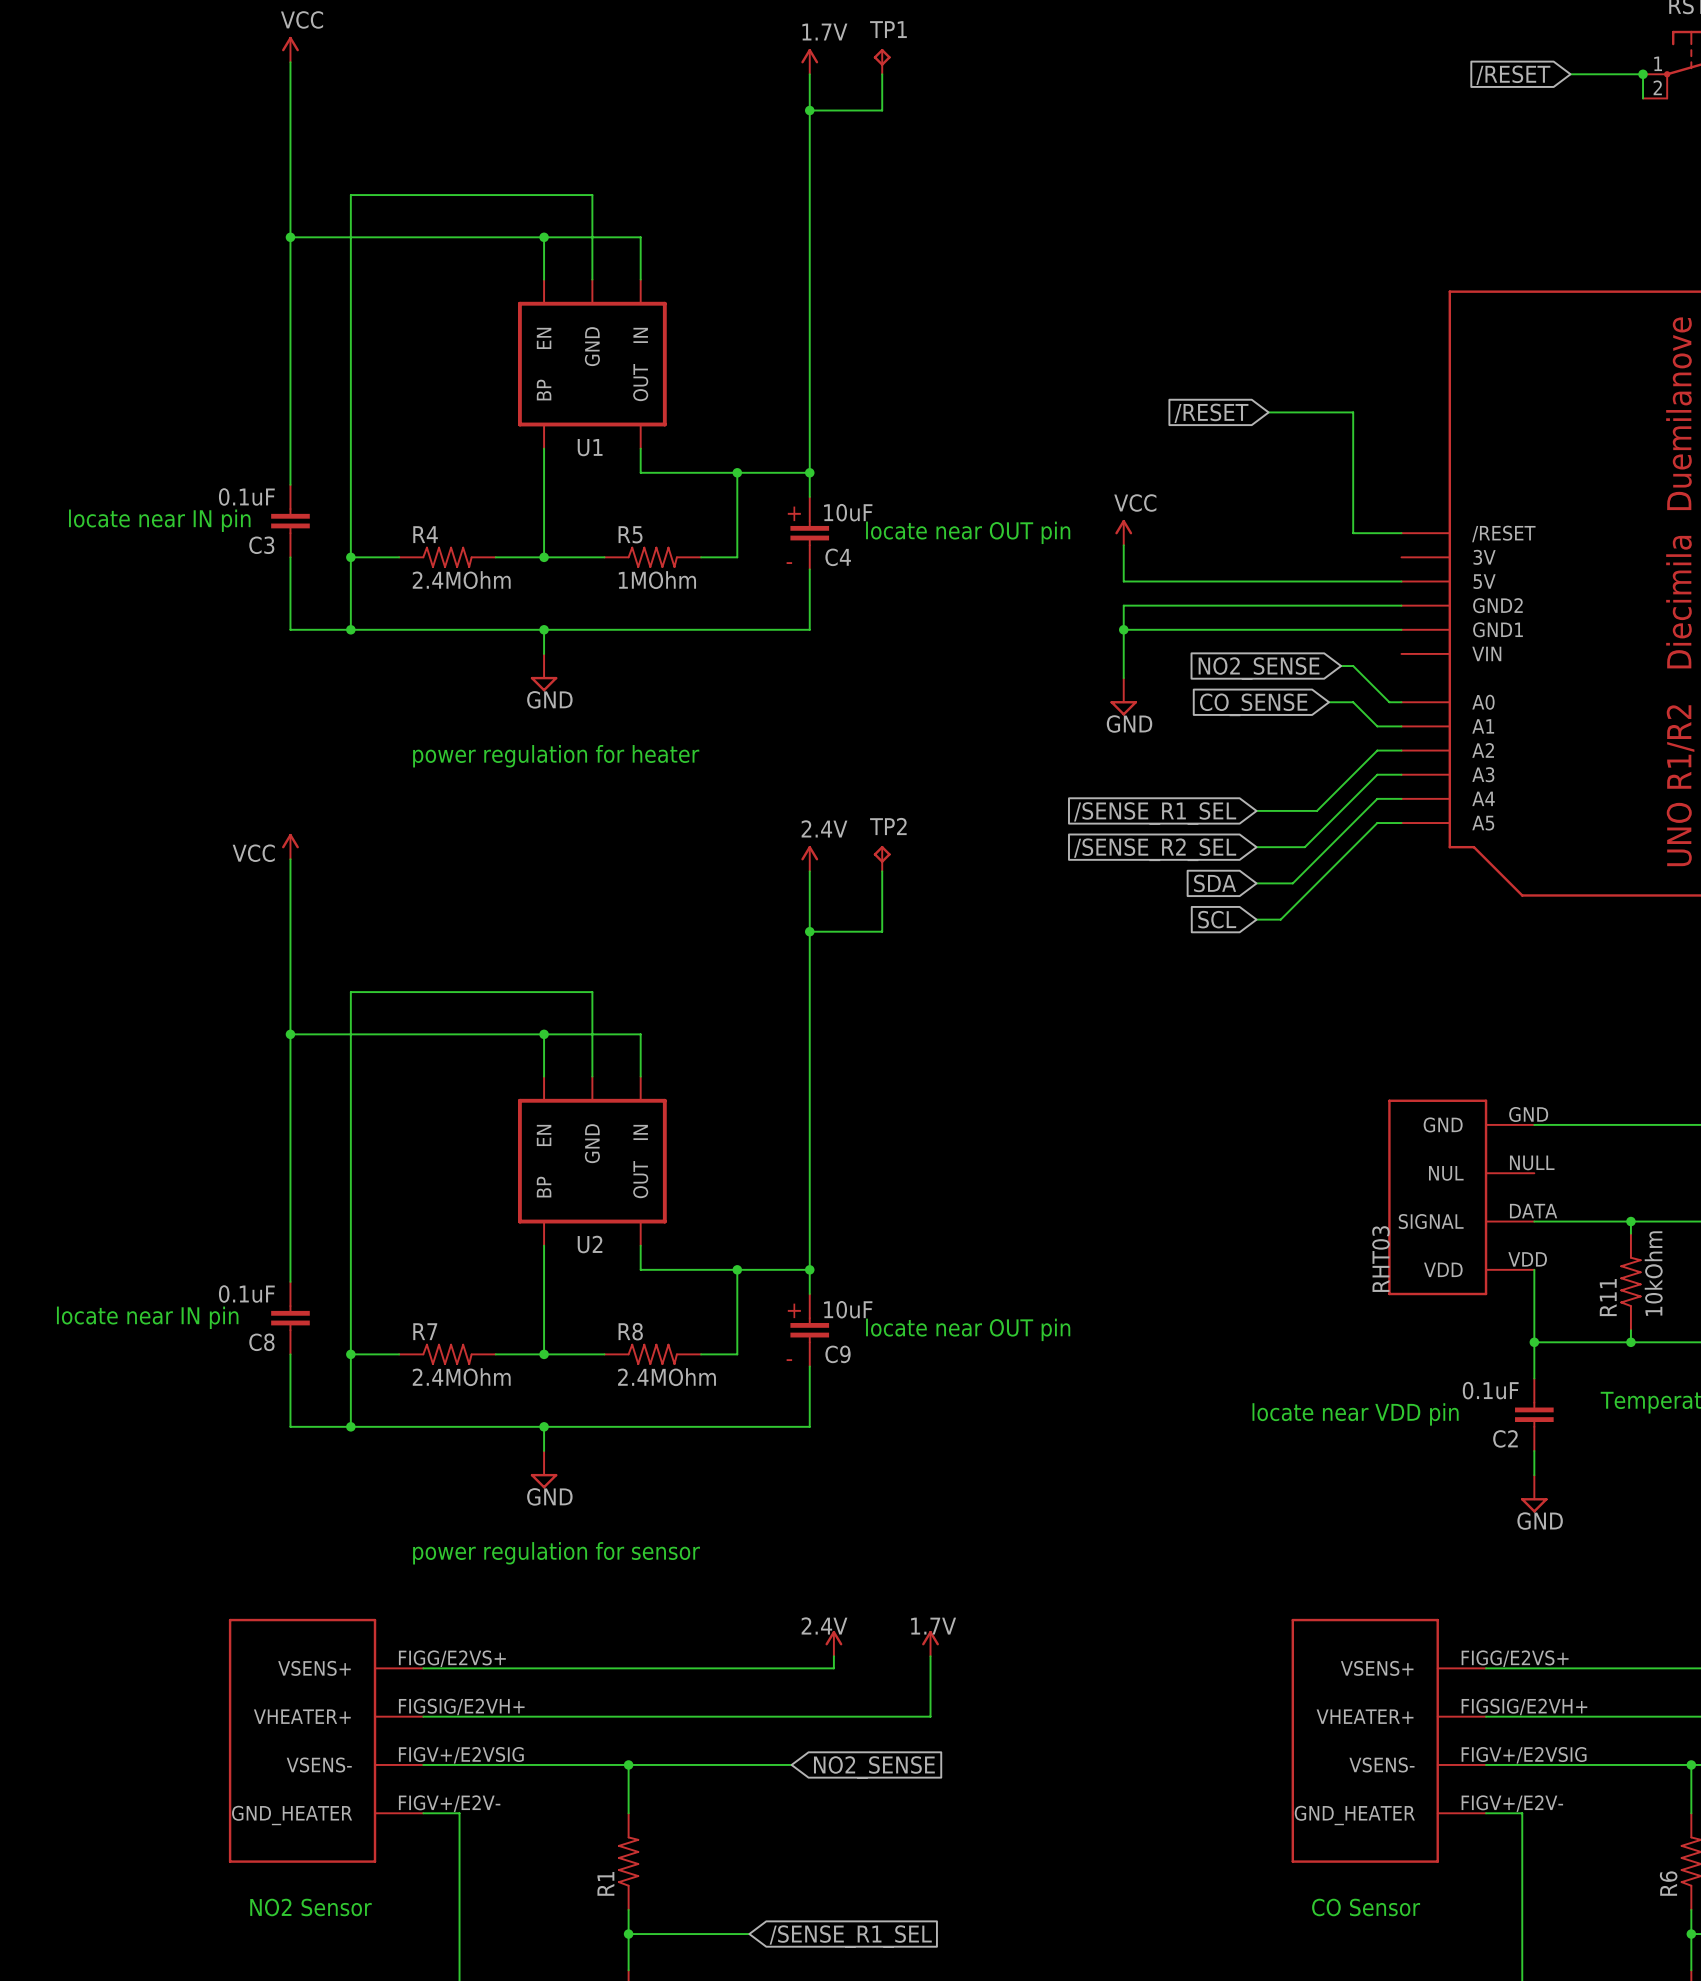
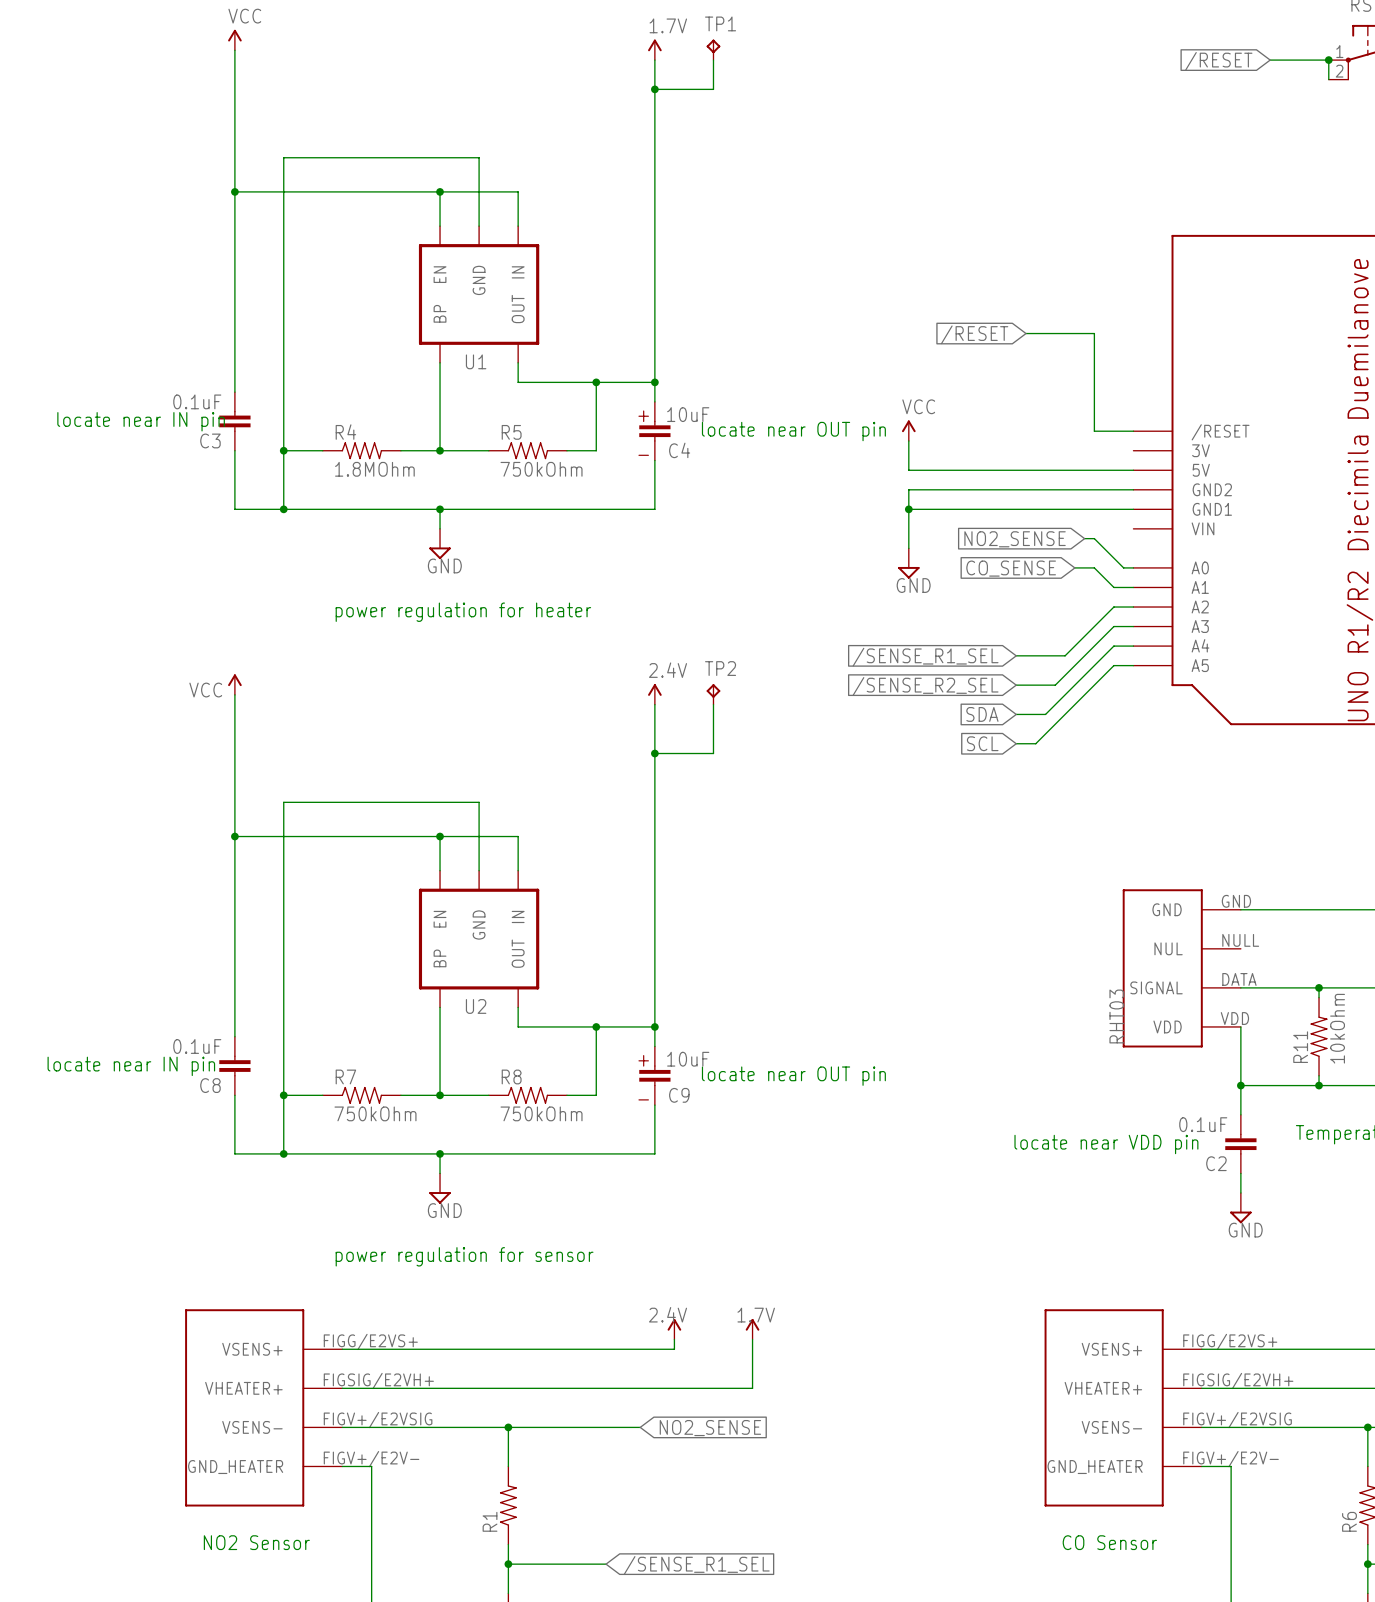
R4 value: 2.4MOhm (461, 580) -> 1.8MOhm (374, 469)
R5 value: 1MOhm (657, 580) -> 750kOhm (541, 469)
R7 value: 2.4MOhm (461, 1377) -> 750kOhm (375, 1113)
R8 value: 2.4MOhm (667, 1377) -> 750kOhm (541, 1113)

